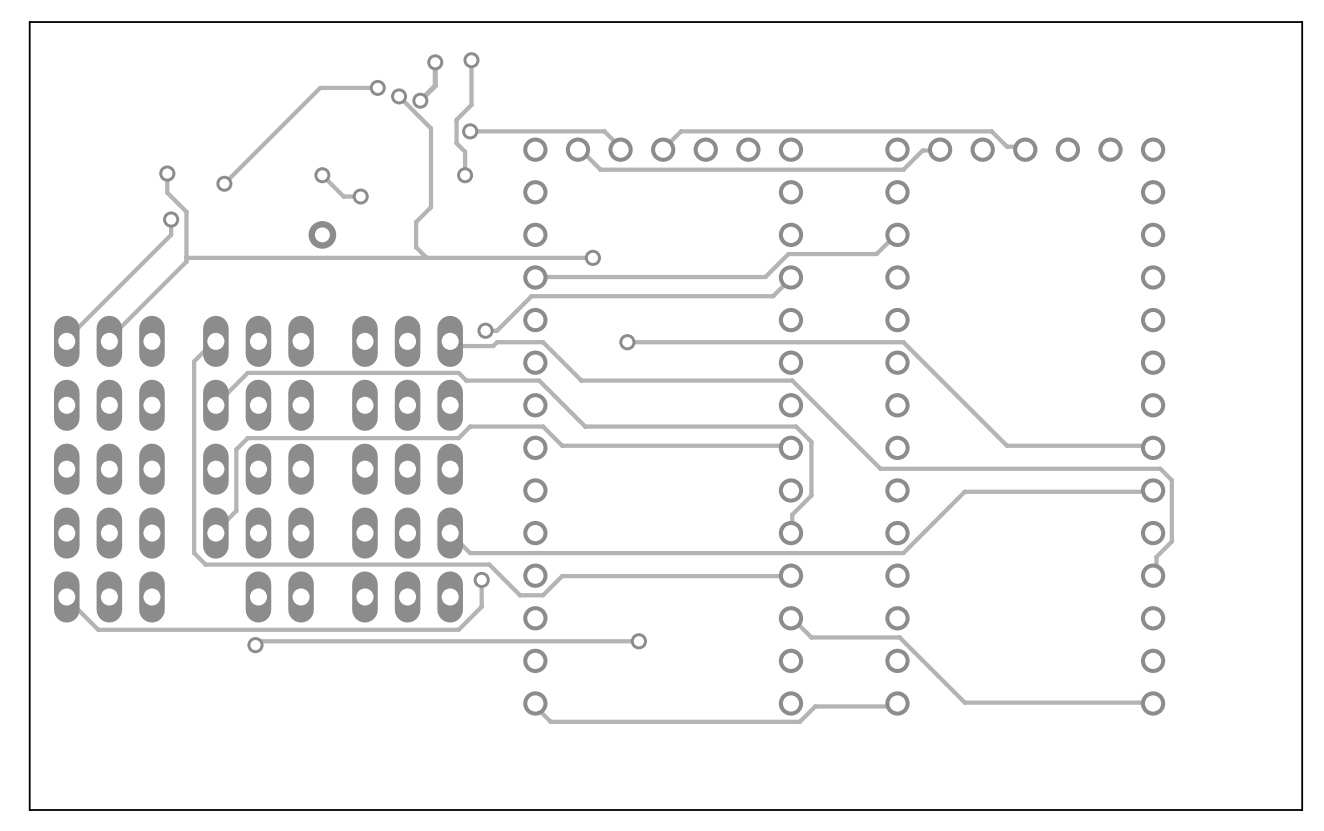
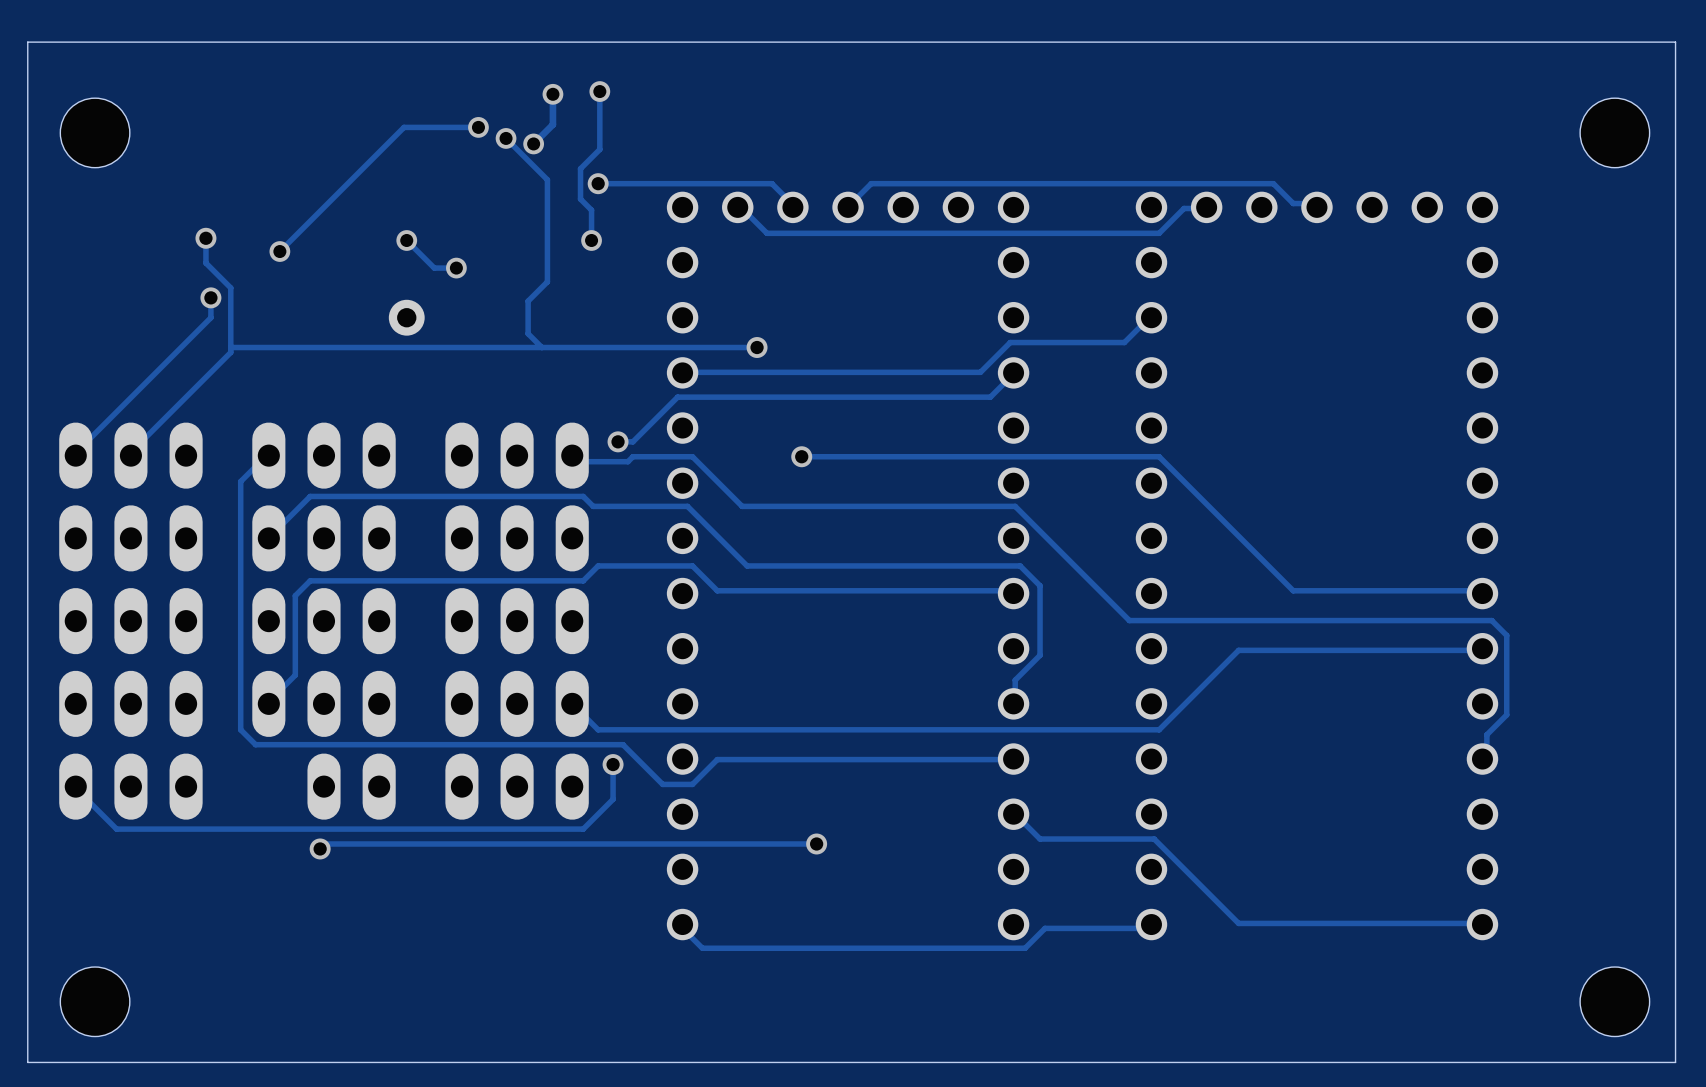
hole: none -> (95, 132)
hole: none -> (1614, 132)
hole: none -> (95, 1001)
hole: none -> (1614, 1001)

